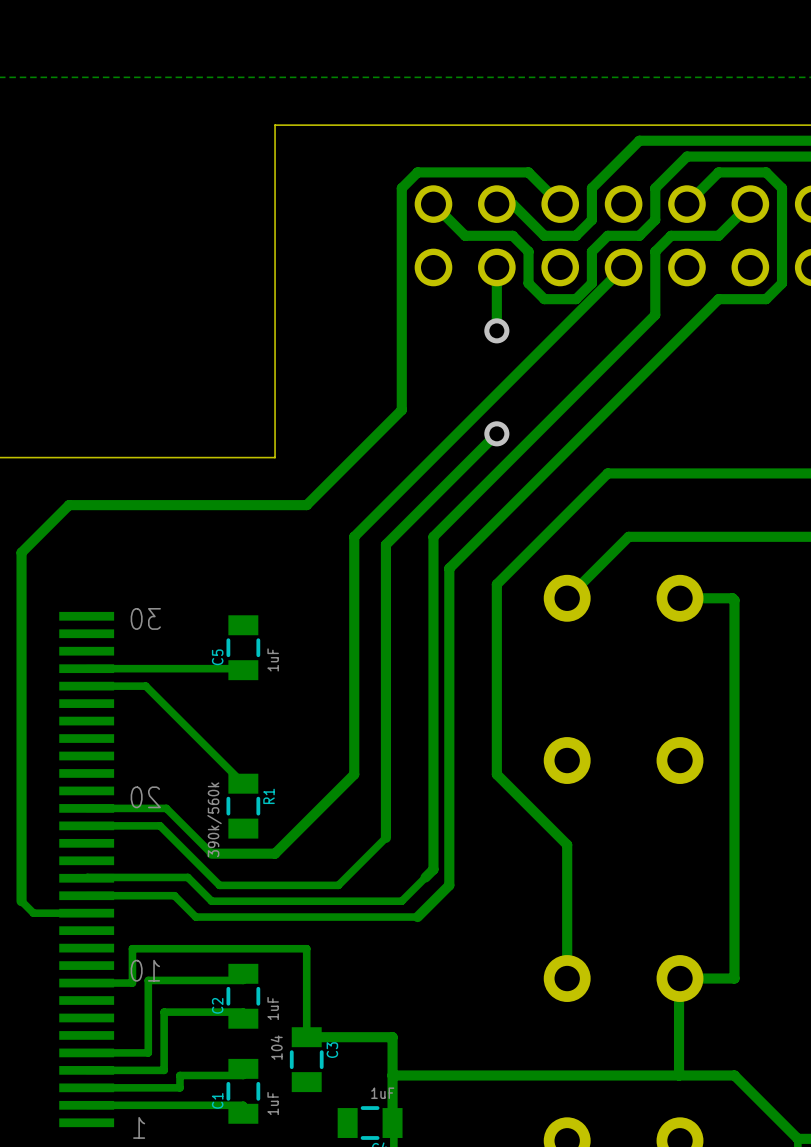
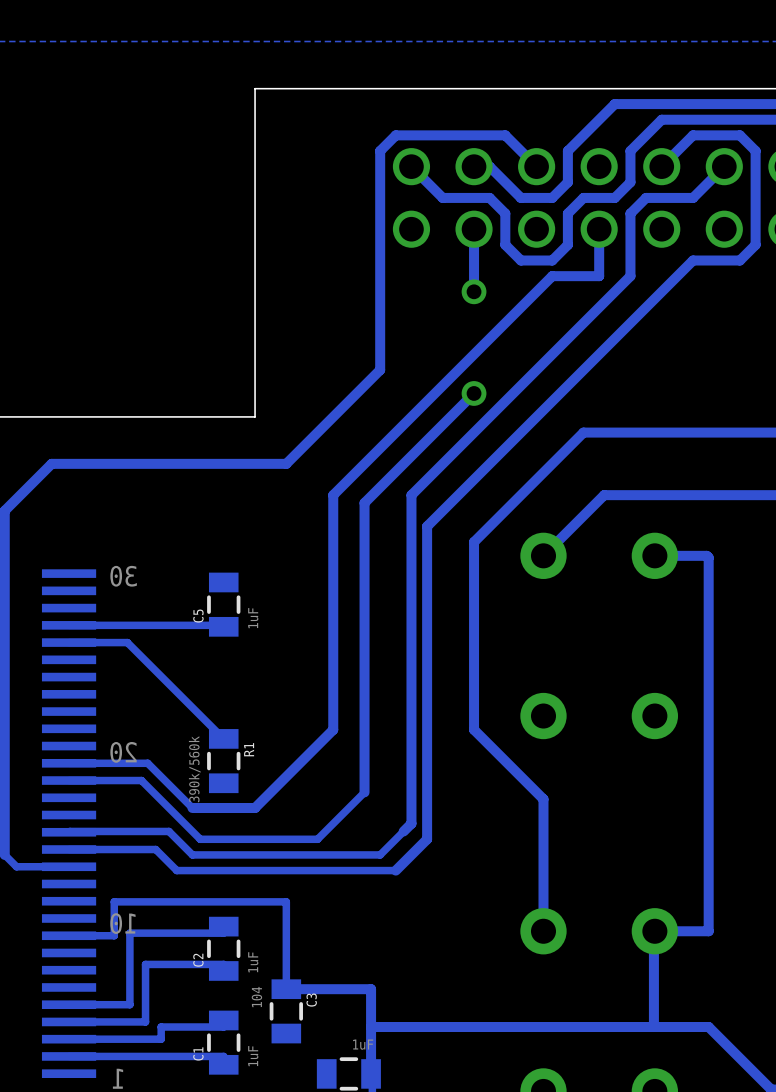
track: (623, 267) (576, 315) -> (599, 229) (599, 276) (552, 276)

